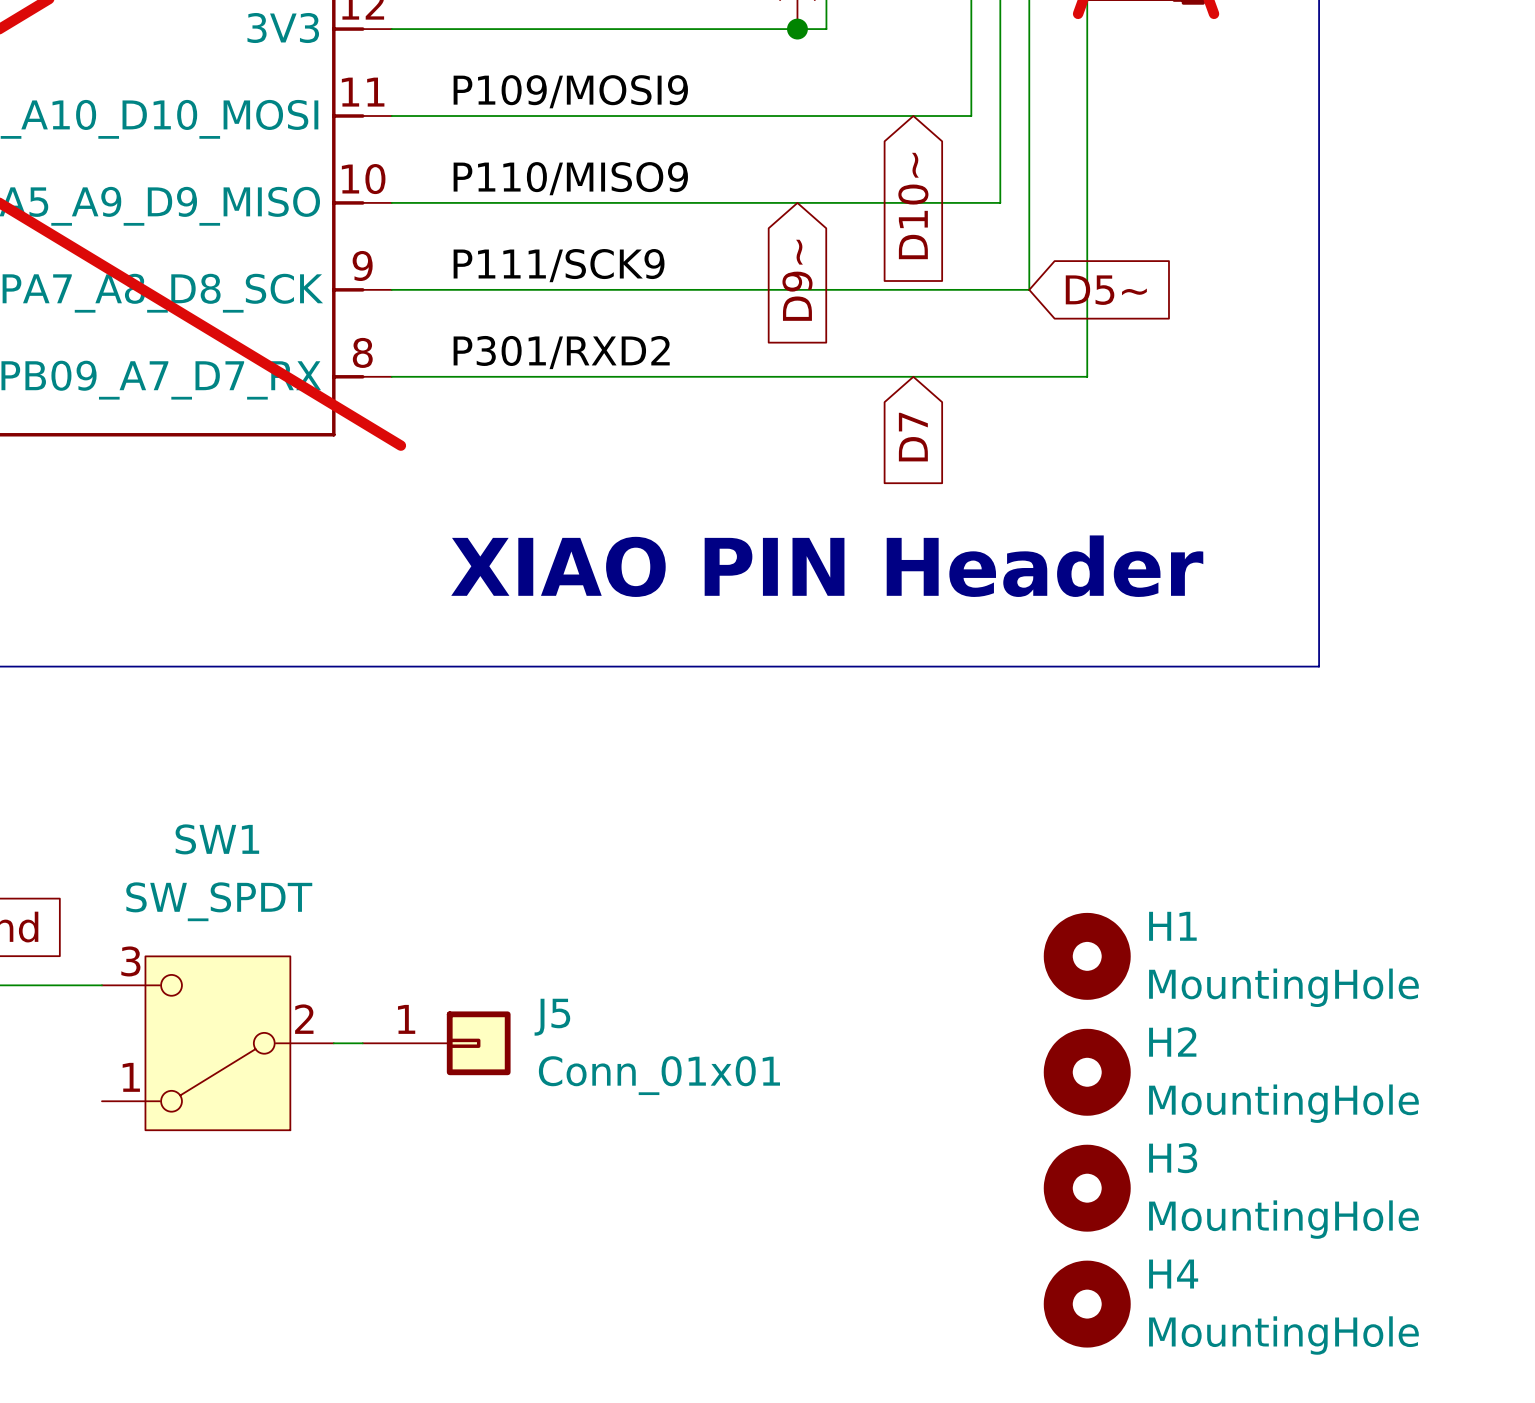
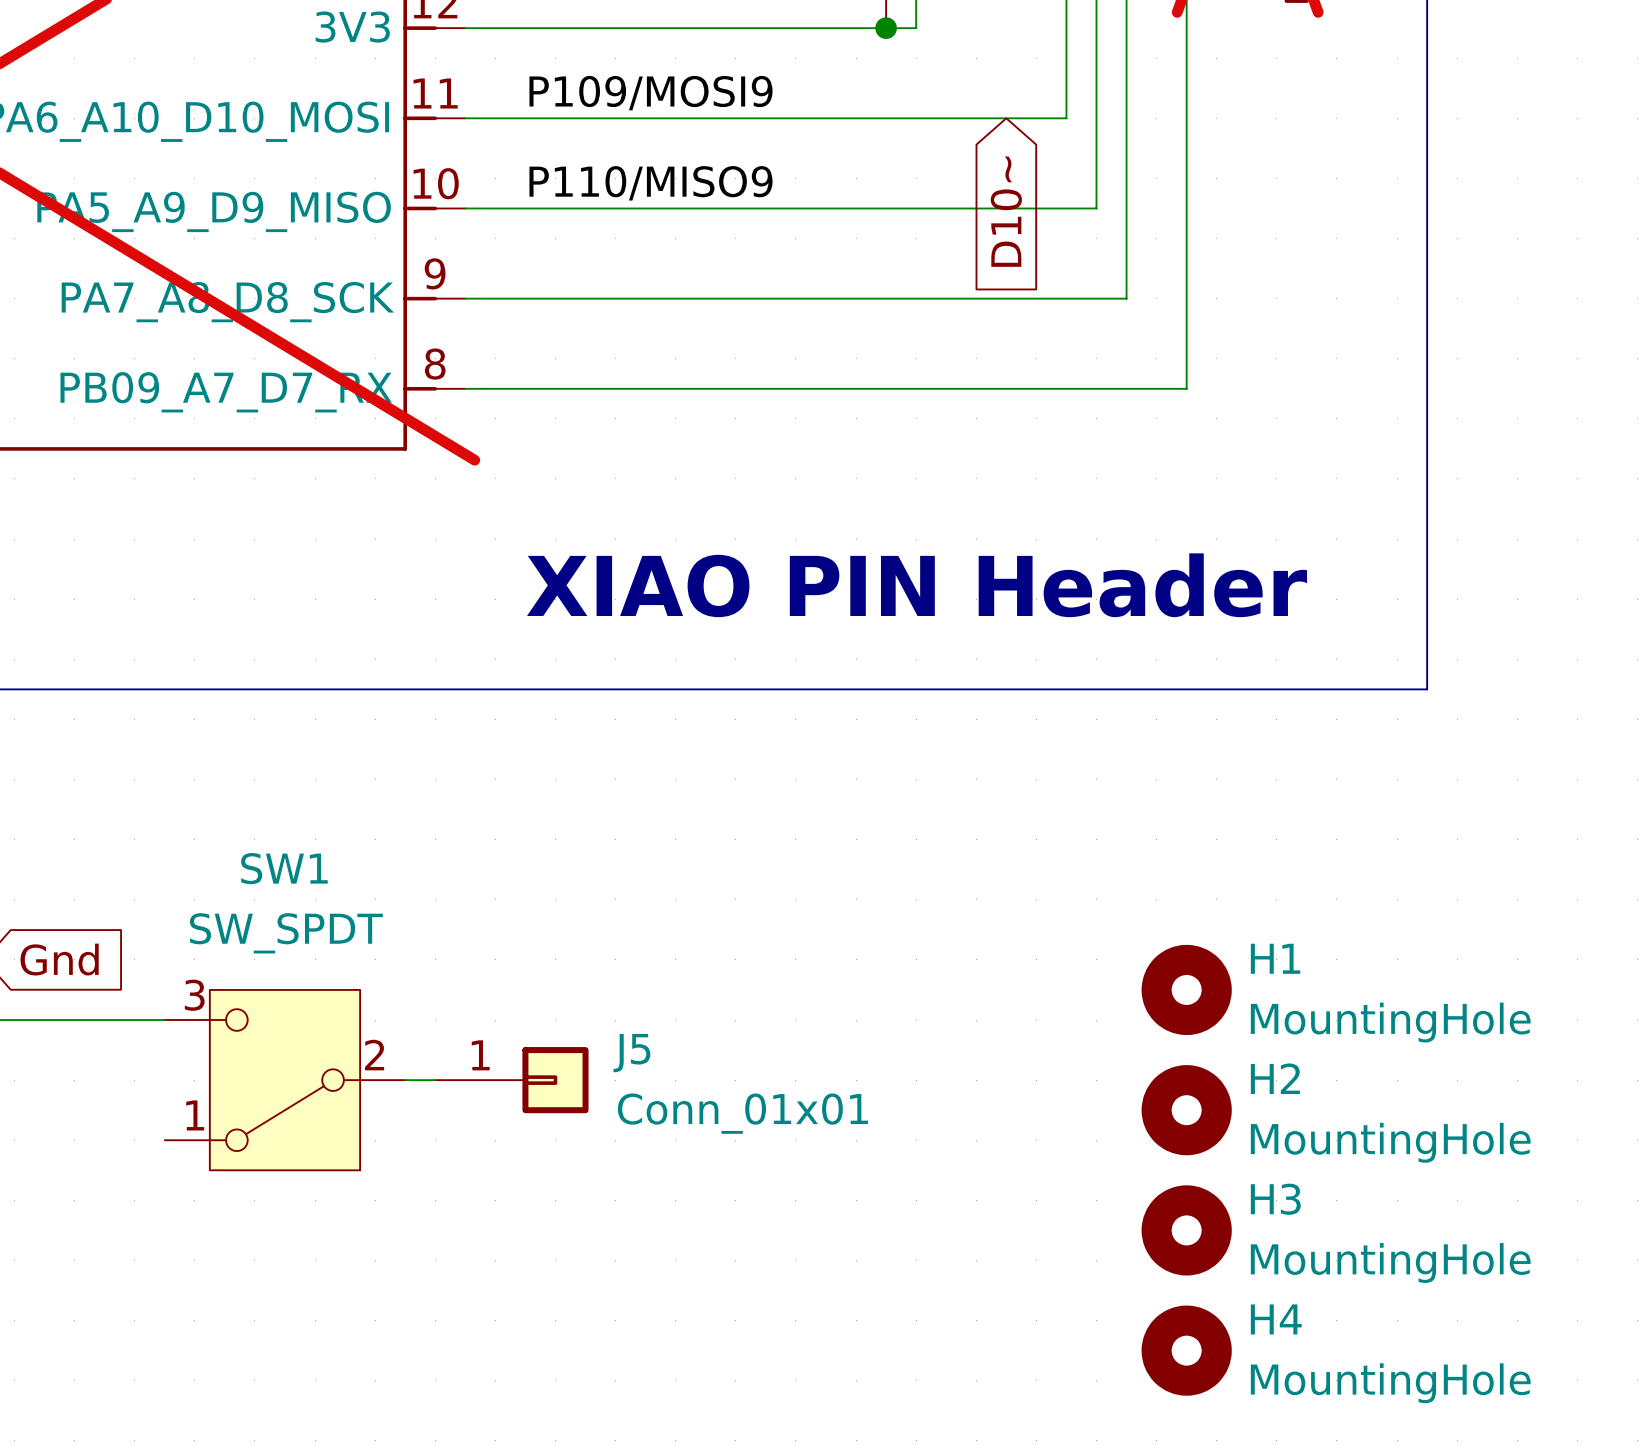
label: P111/SCK9 (559, 265) -> none
global label: D9~ (797, 280) -> none
global label: D5~ (1106, 290) -> none
label: P301/RXD2 (561, 352) -> none
global label: D7 (913, 437) -> none

